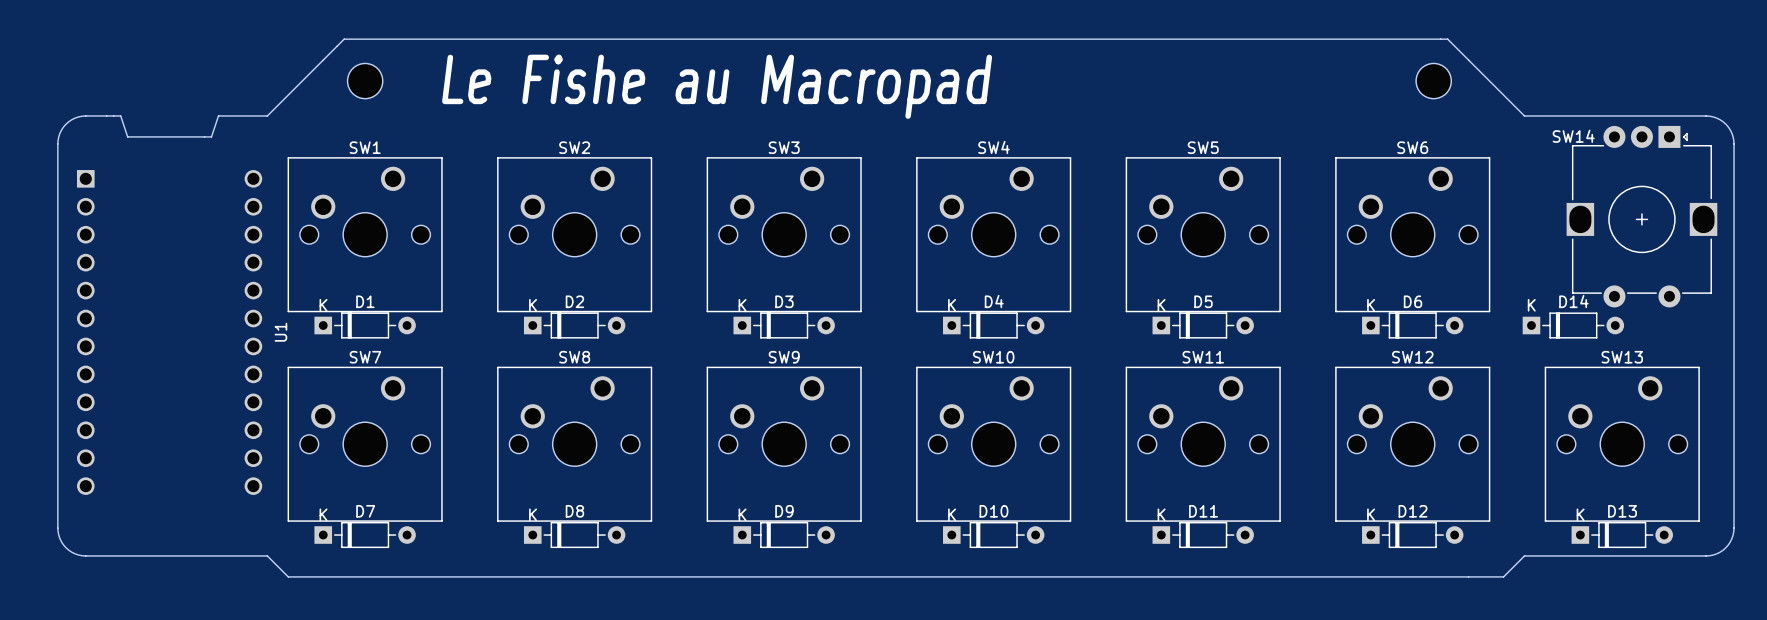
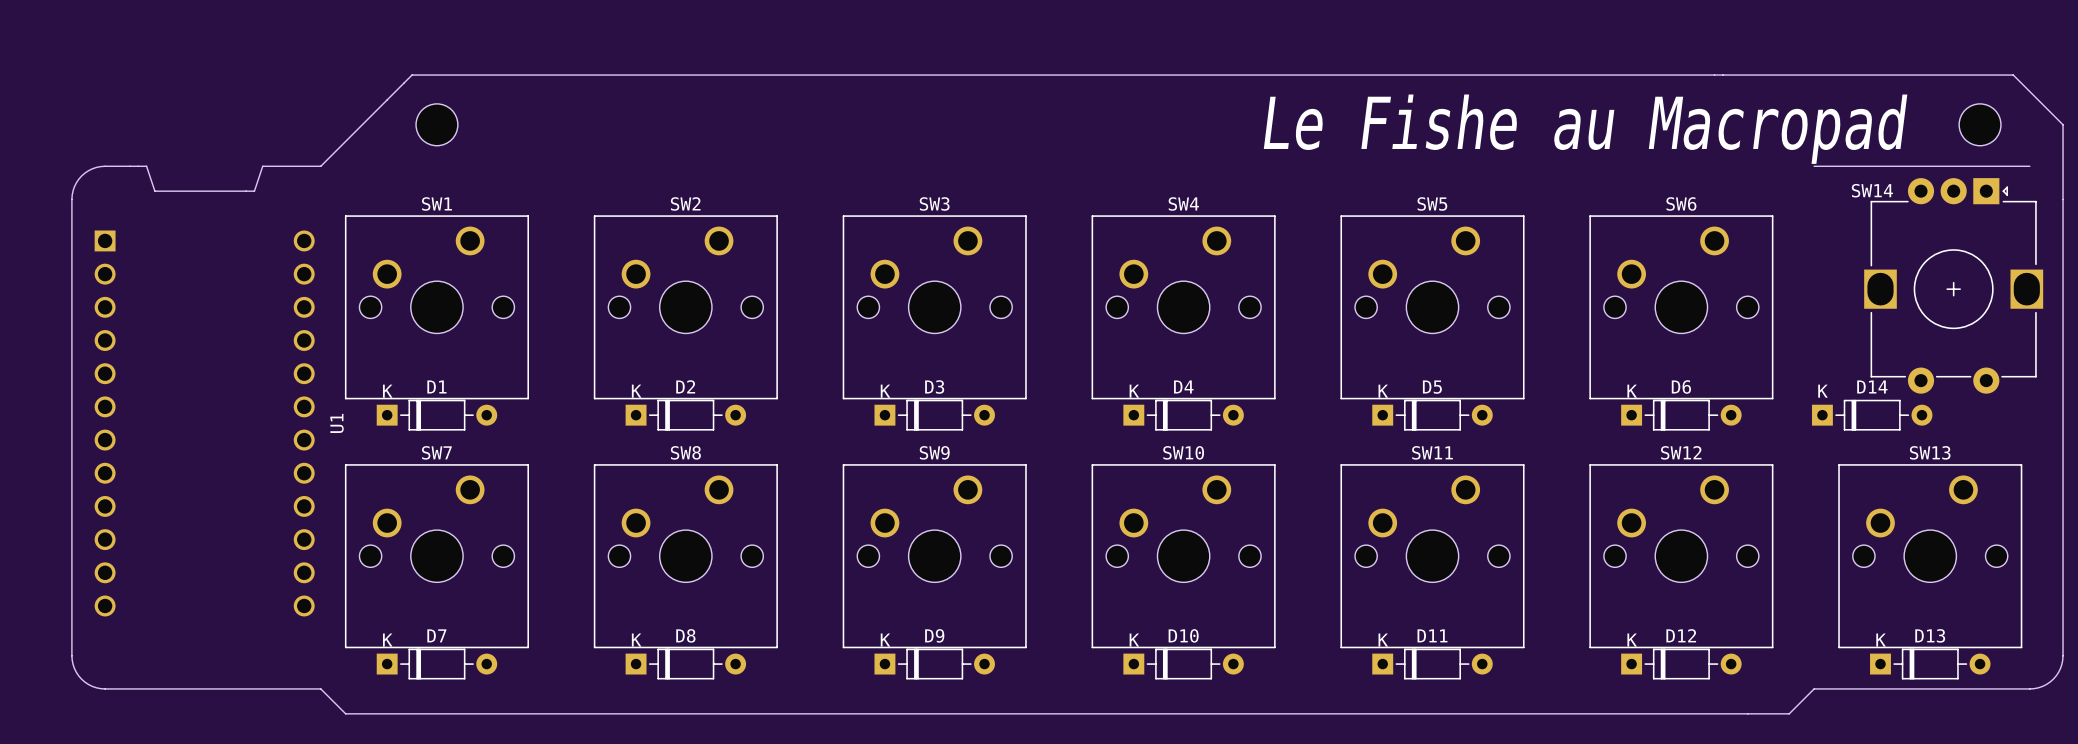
board edge: (1447, 39) (1524, 115) -> (1722, 75) (2013, 75) (2063, 124) (2063, 199)
part position: (1433, 81) -> (1980, 124)
text: Le Fishe au Macropad (717, 86) -> none
text: none -> Le Fishe au Macropad (1585, 129)
board edge: (1706, 115) (1716, 118) (1725, 124) (1731, 133) (1734, 143) -> none

